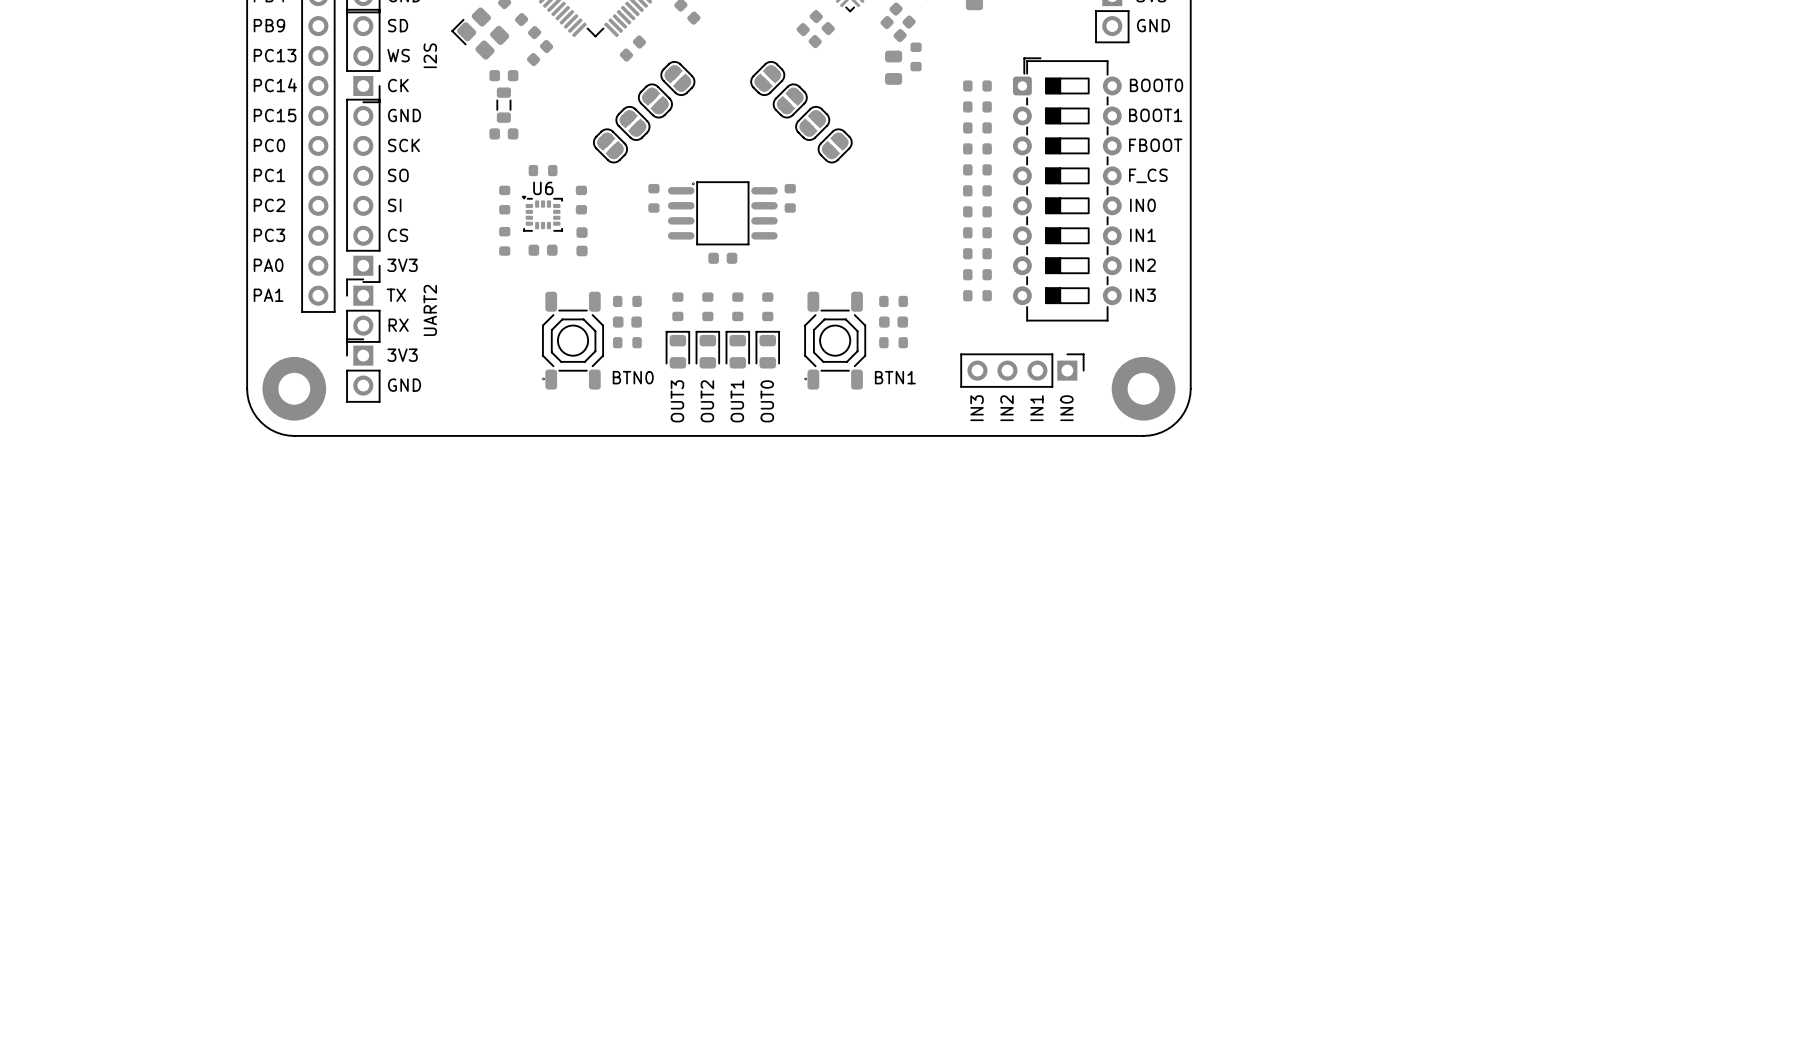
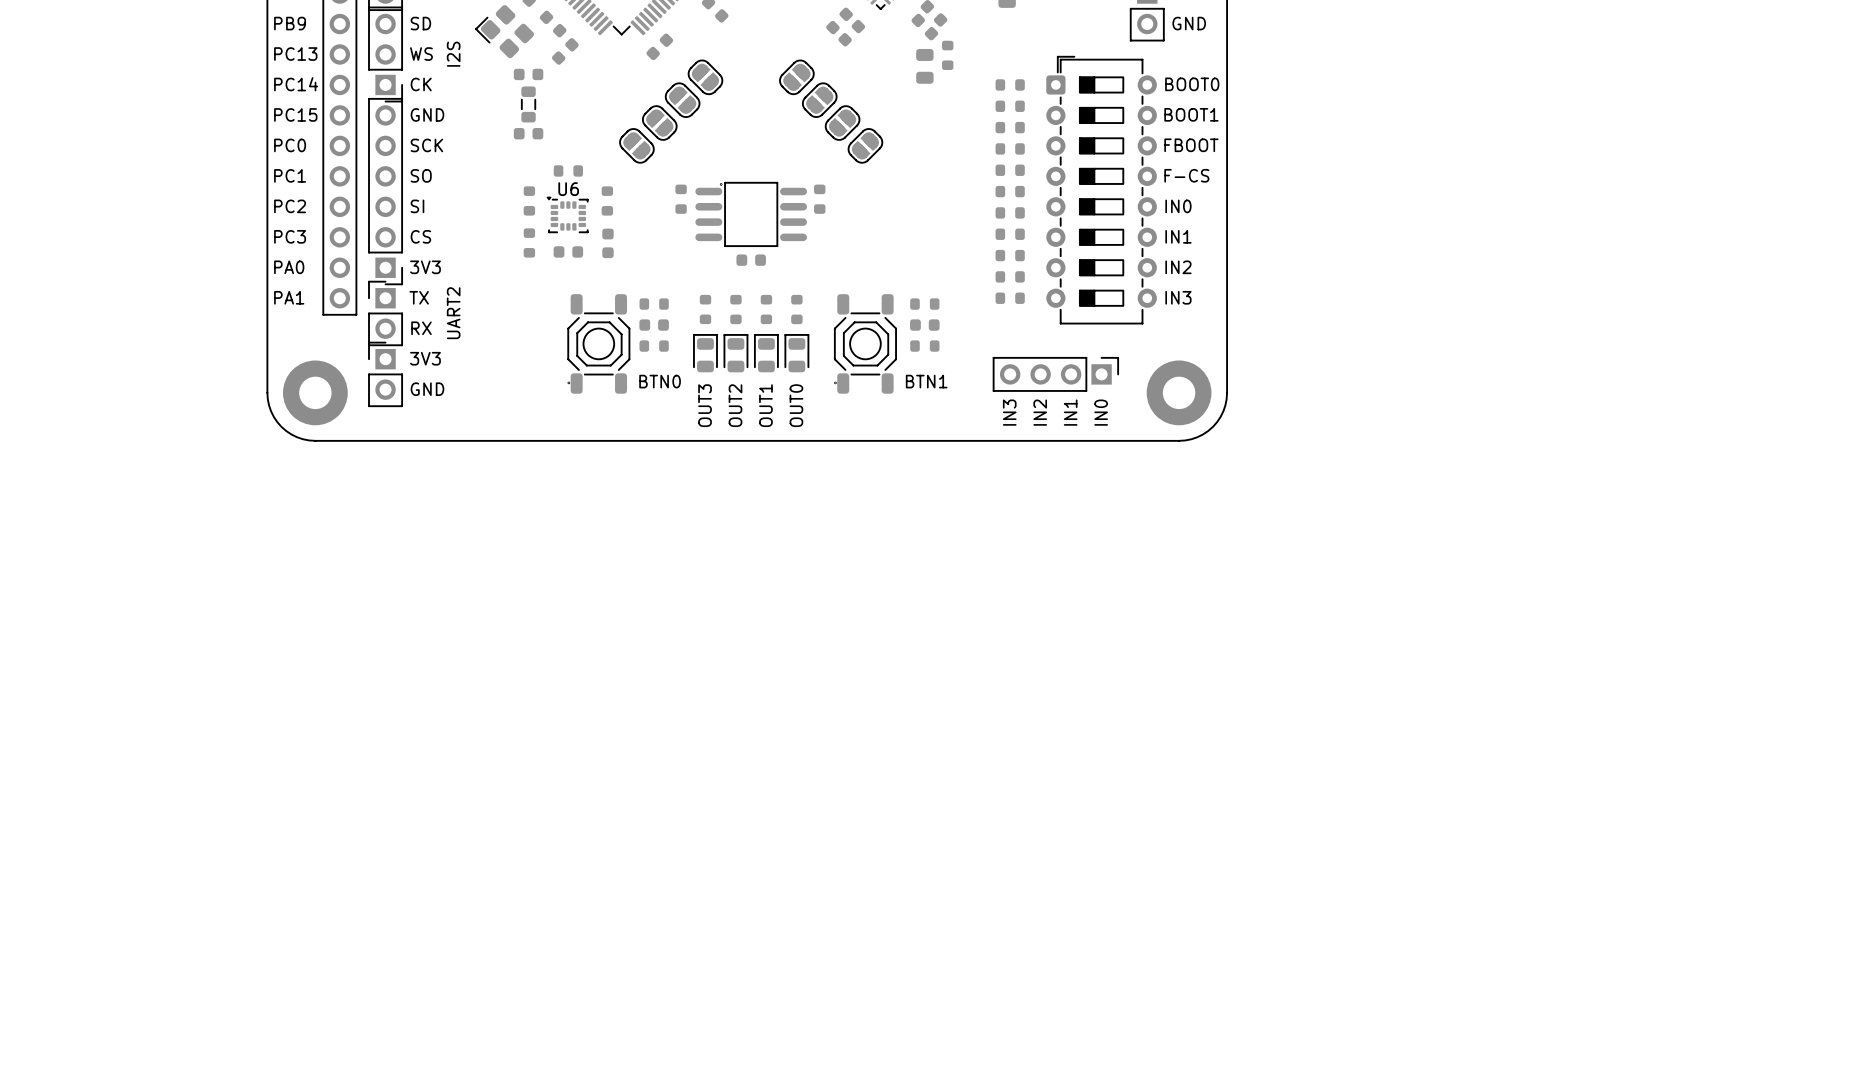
text: F_CS (1148, 175) -> F-CS (1186, 175)

